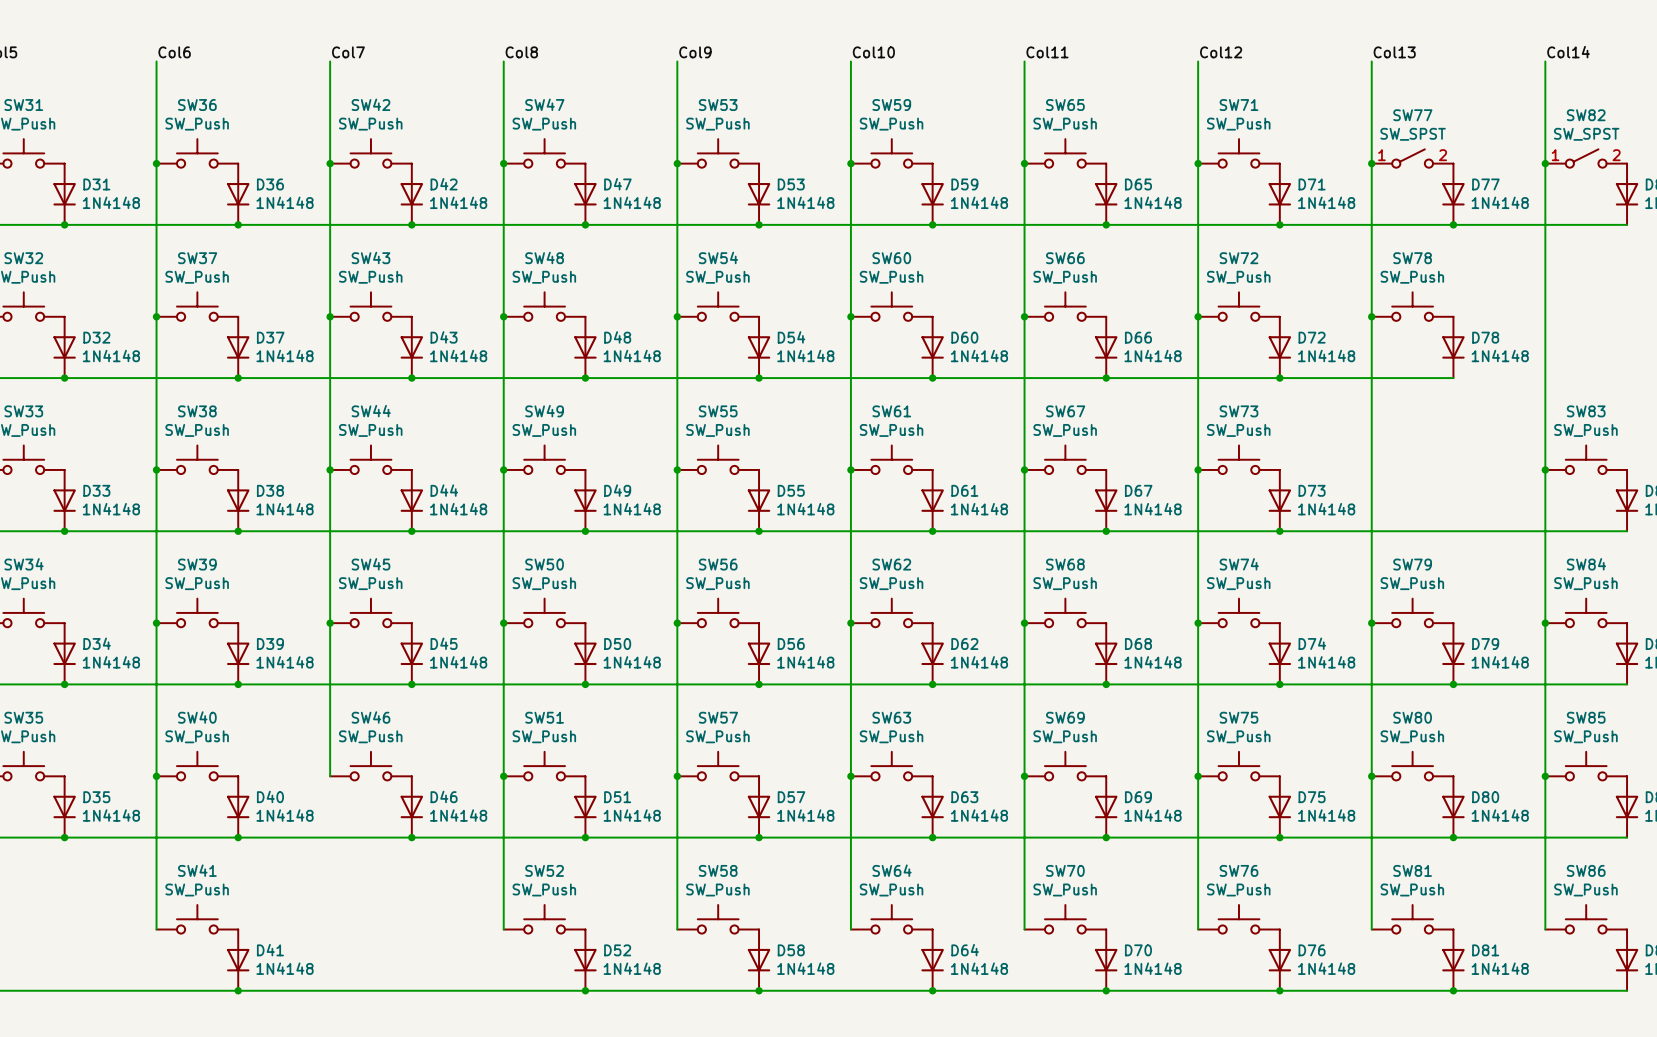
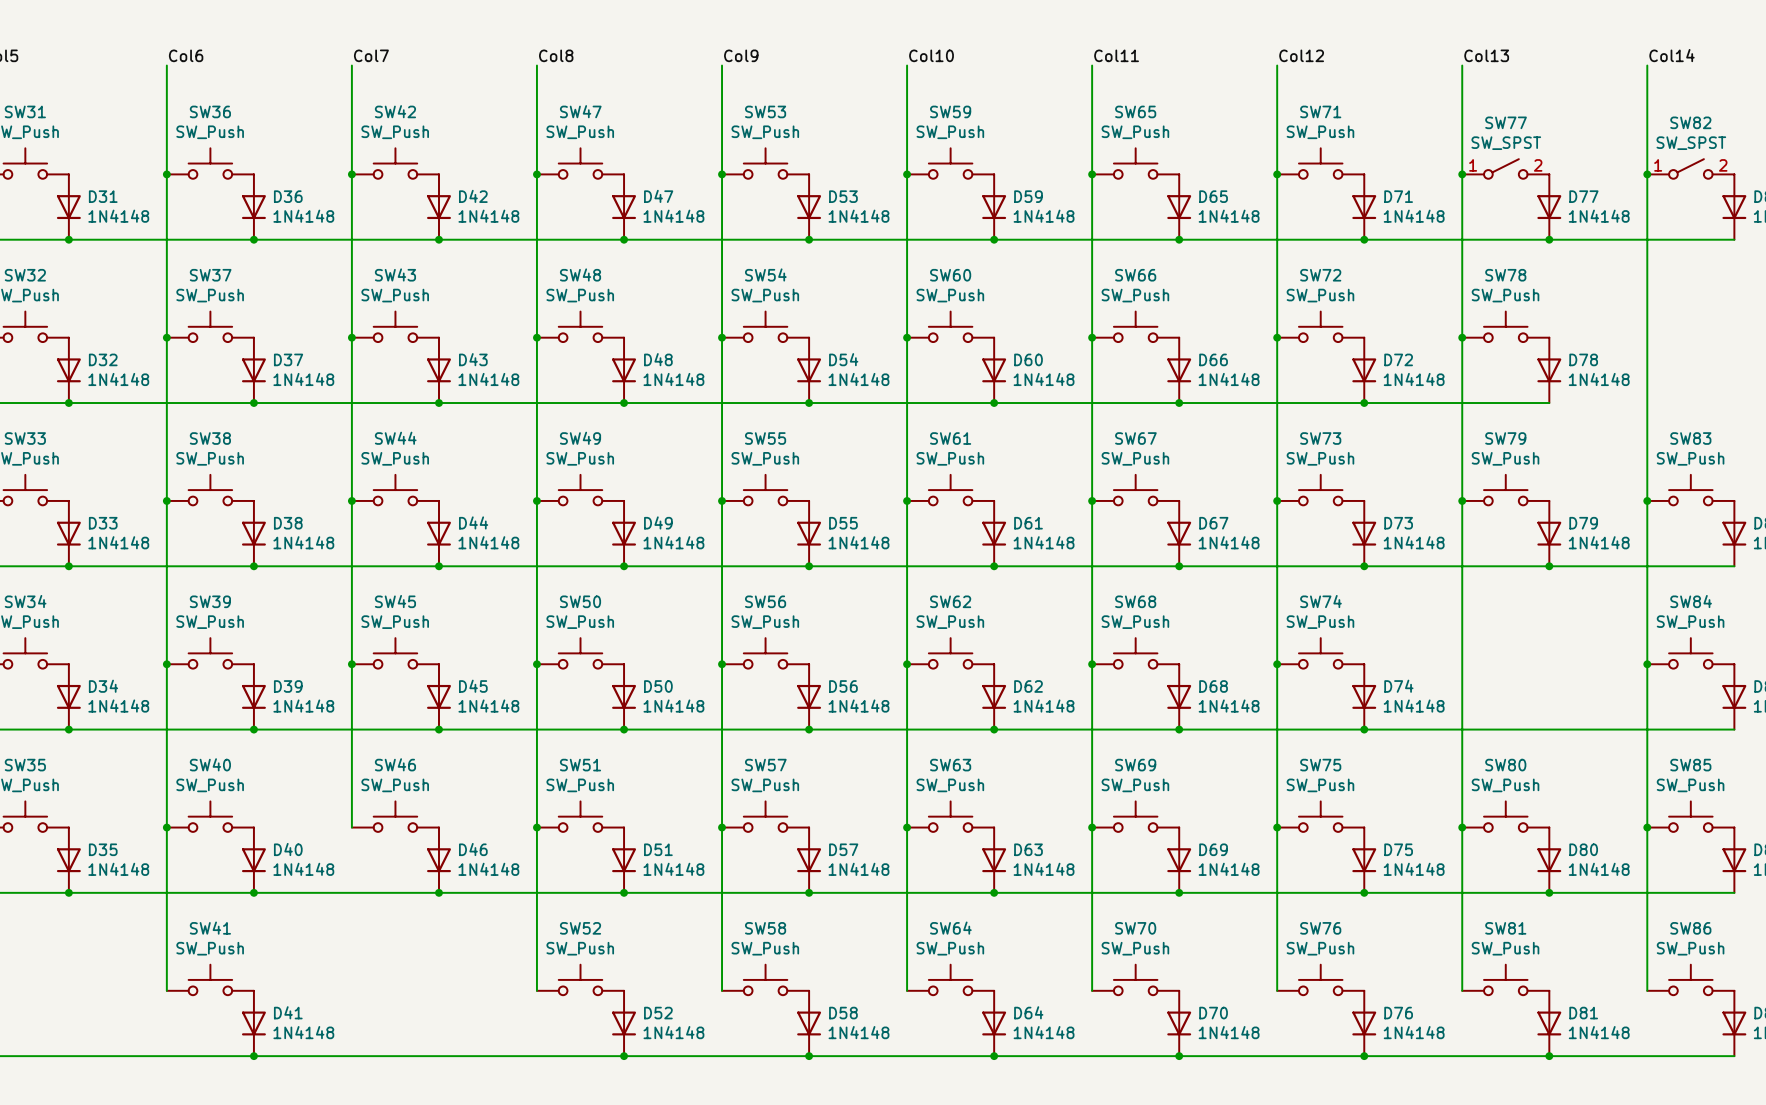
junction: none -> (1462, 500)
junction: none -> (1549, 566)
SW79 position: (1412, 612) -> (1505, 490)
junction: (1371, 623) -> none
D79 position: (1453, 653) -> (1549, 533)
junction: (1453, 684) -> none

